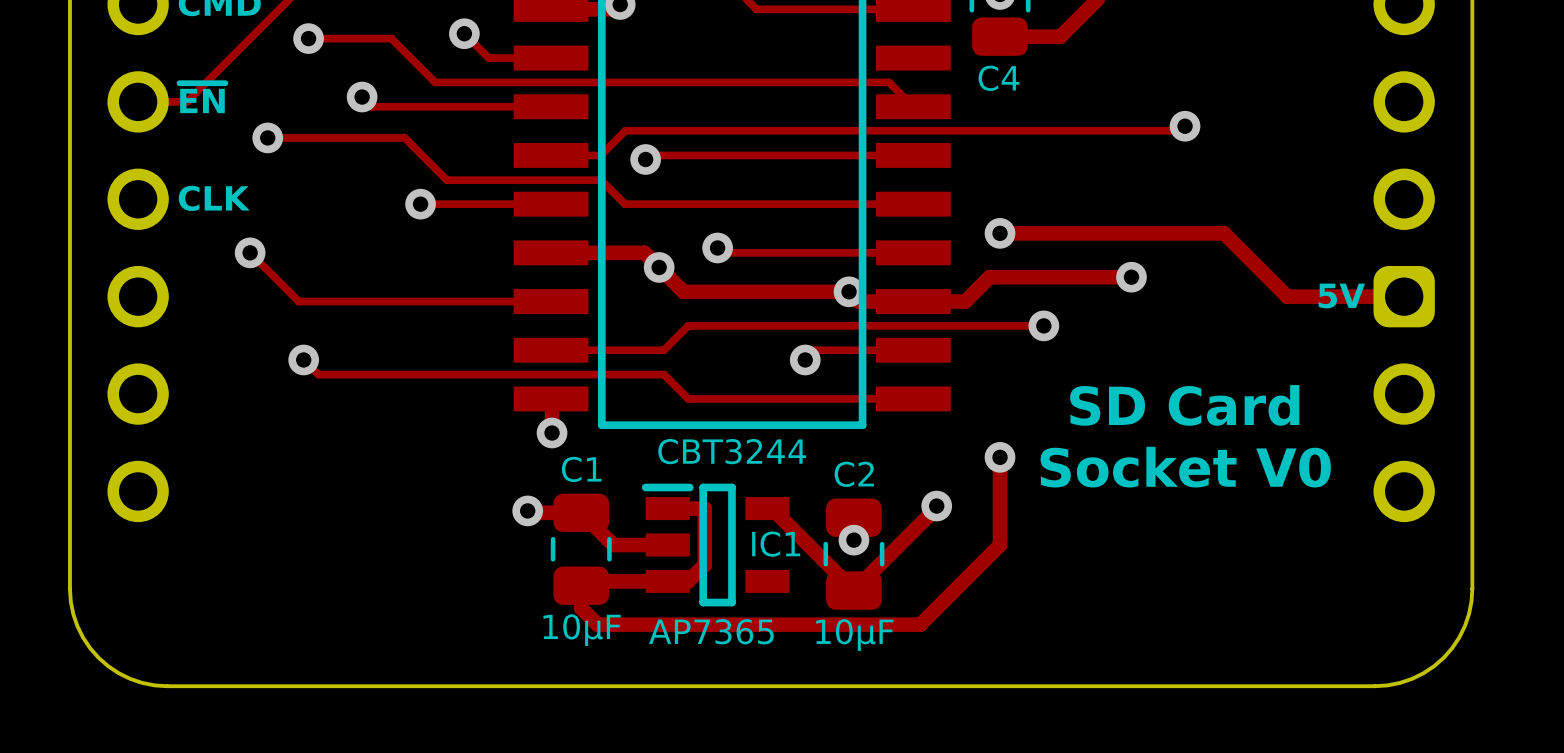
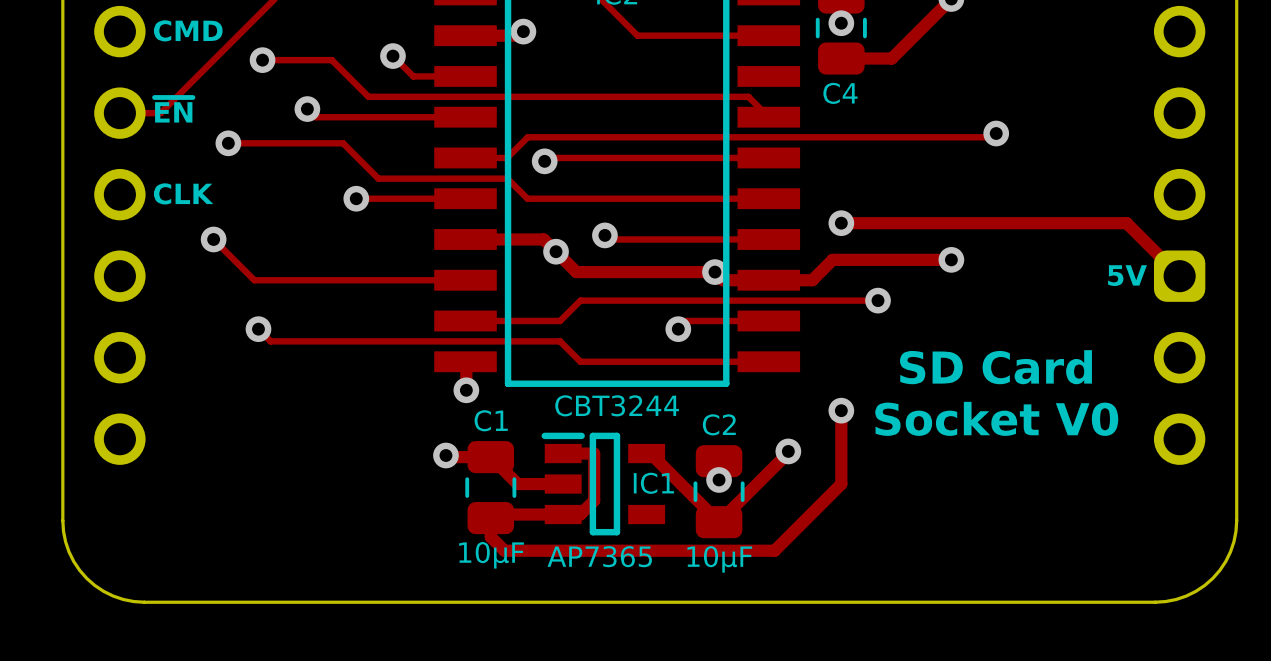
track: (1224, 233) (1287, 296) (1404, 296) -> (1028, 223) (1126, 223) (1179, 276)

